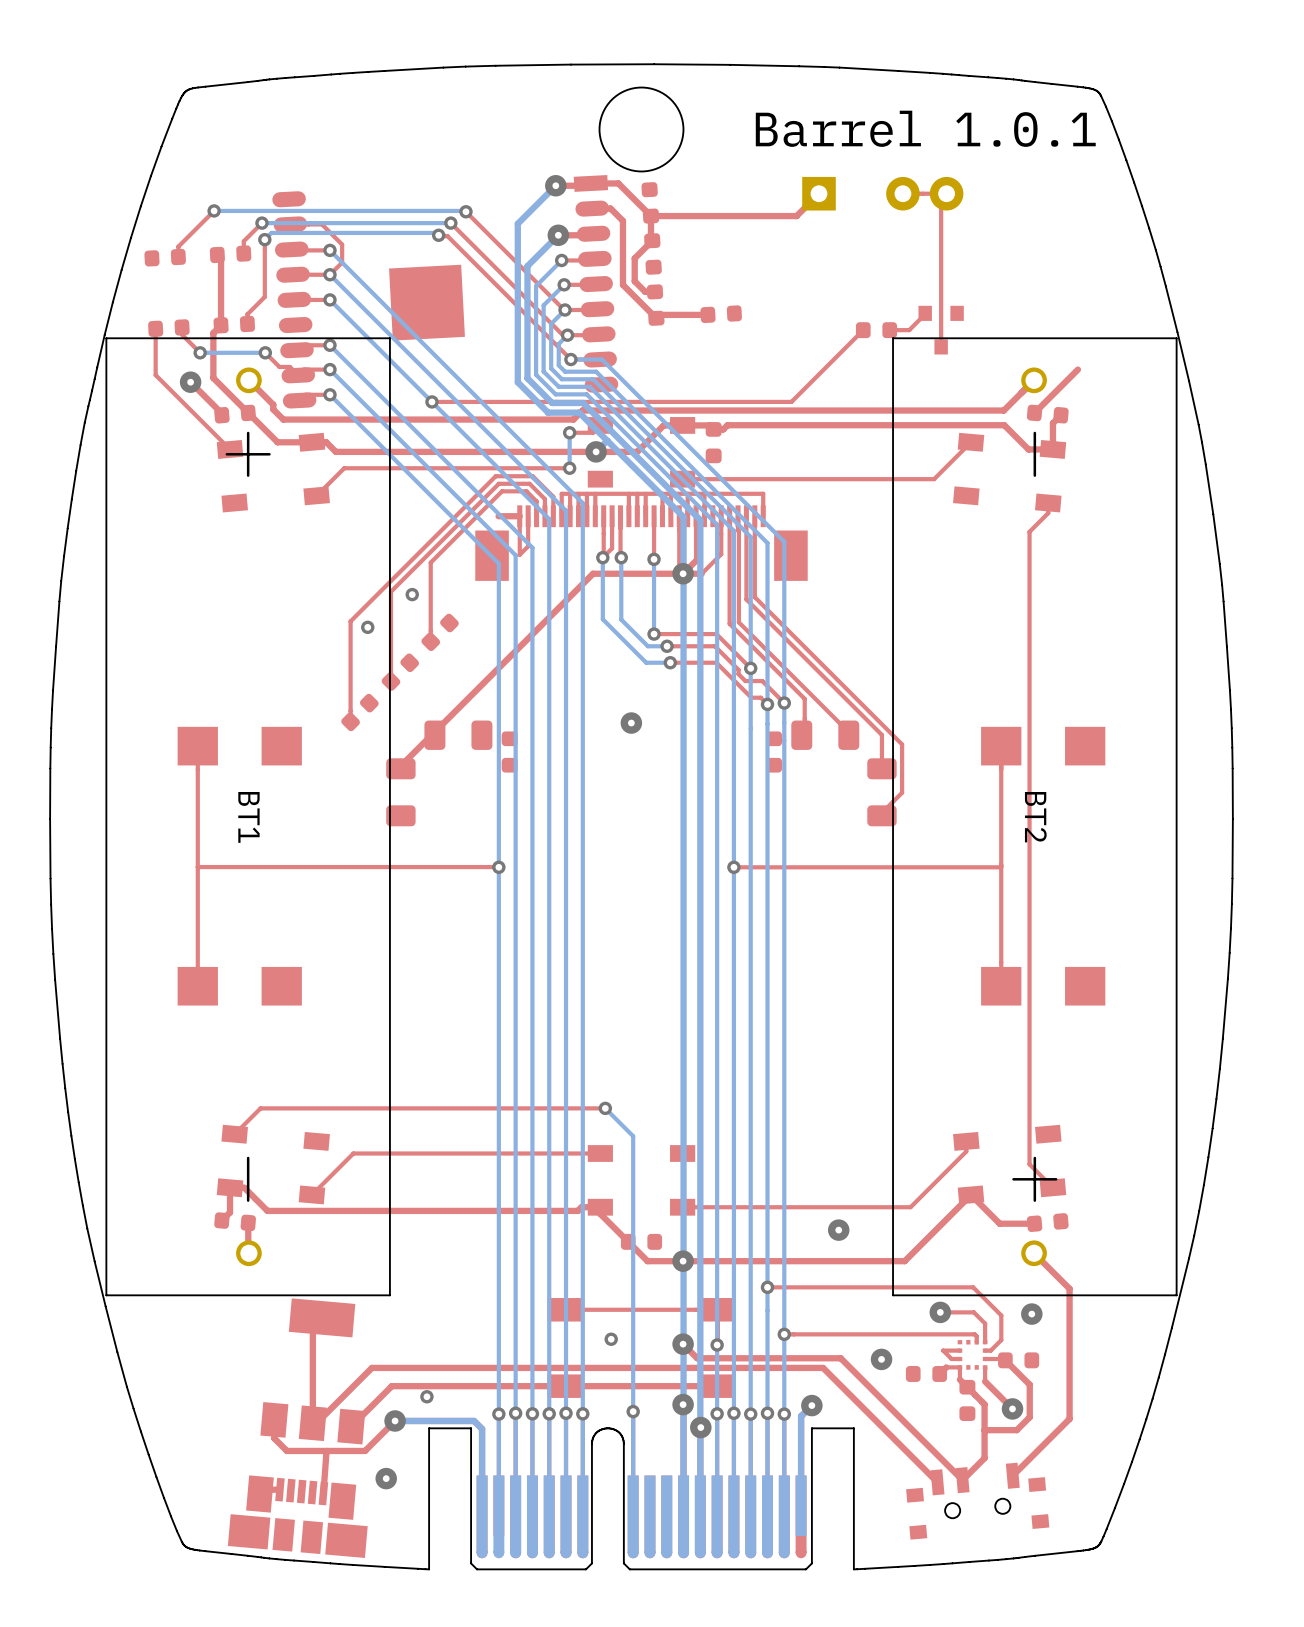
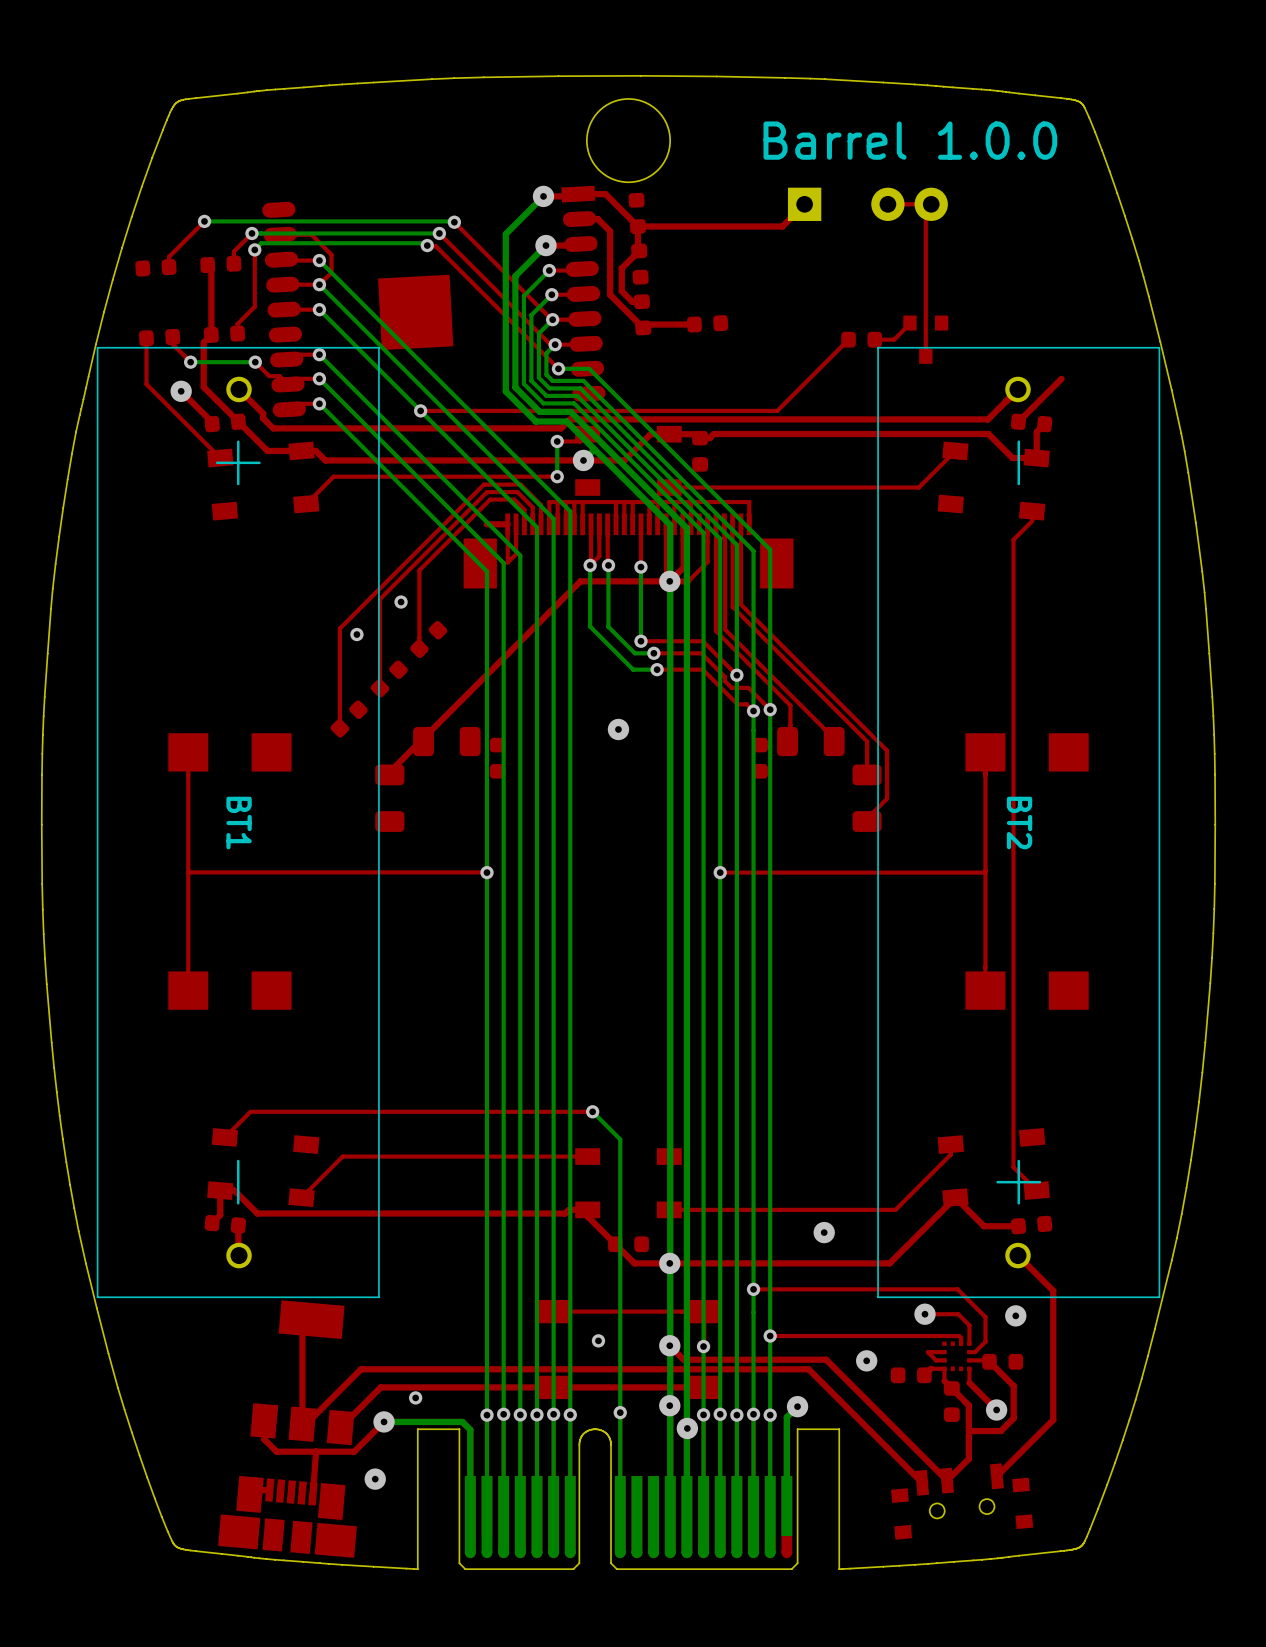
text: Barrel 1.0.1 (925, 128) -> Barrel 1.0.0 (910, 140)

